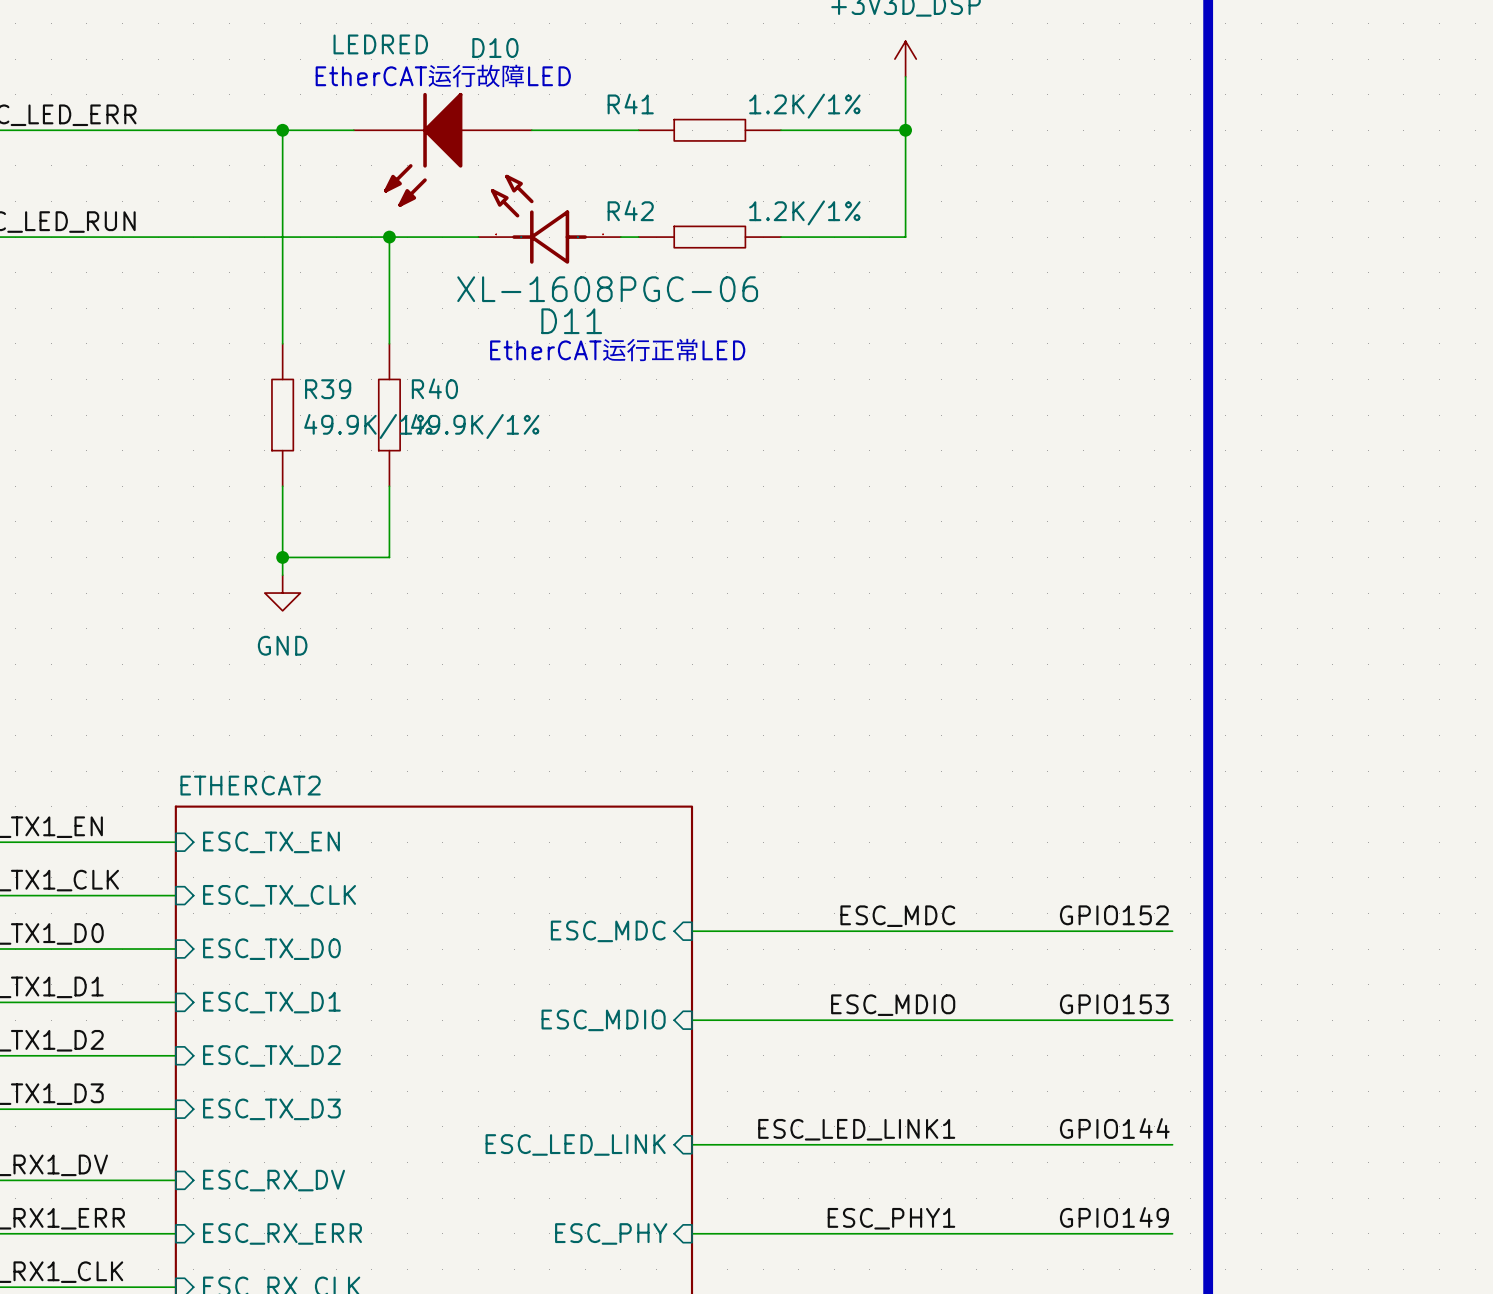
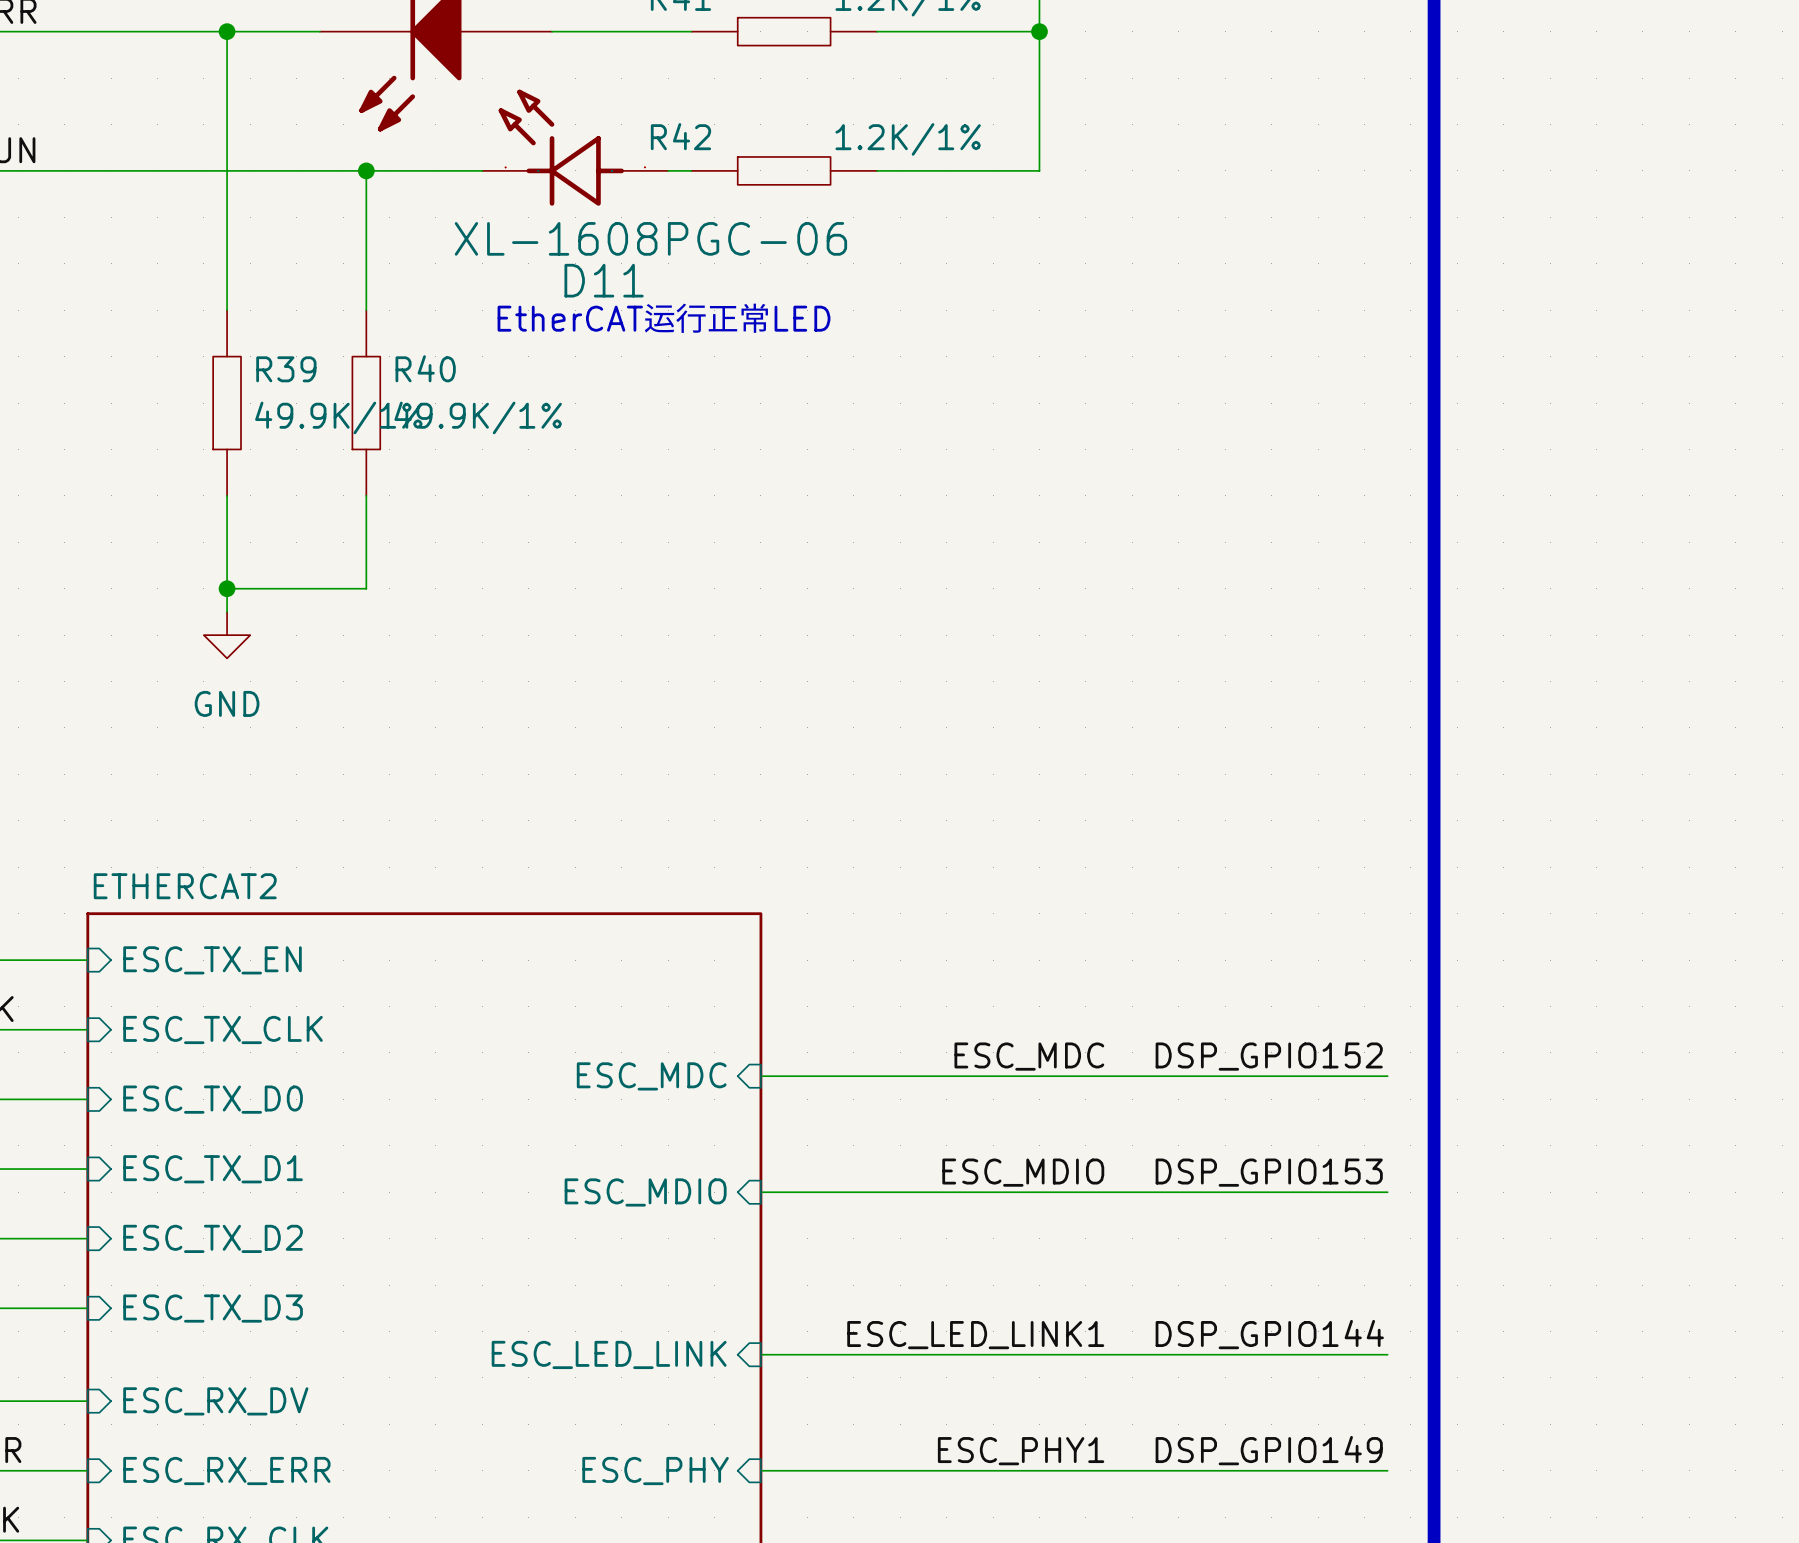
label: GPIO152 (1114, 915) -> DSP_GPIO152 (1269, 1056)
label: GPIO153 (1114, 1004) -> DSP_GPIO153 (1269, 1172)
label: GPIO144 (1114, 1128) -> DSP_GPIO144 (1269, 1334)
label: GPIO149 (1114, 1217) -> DSP_GPIO149 (1269, 1450)

